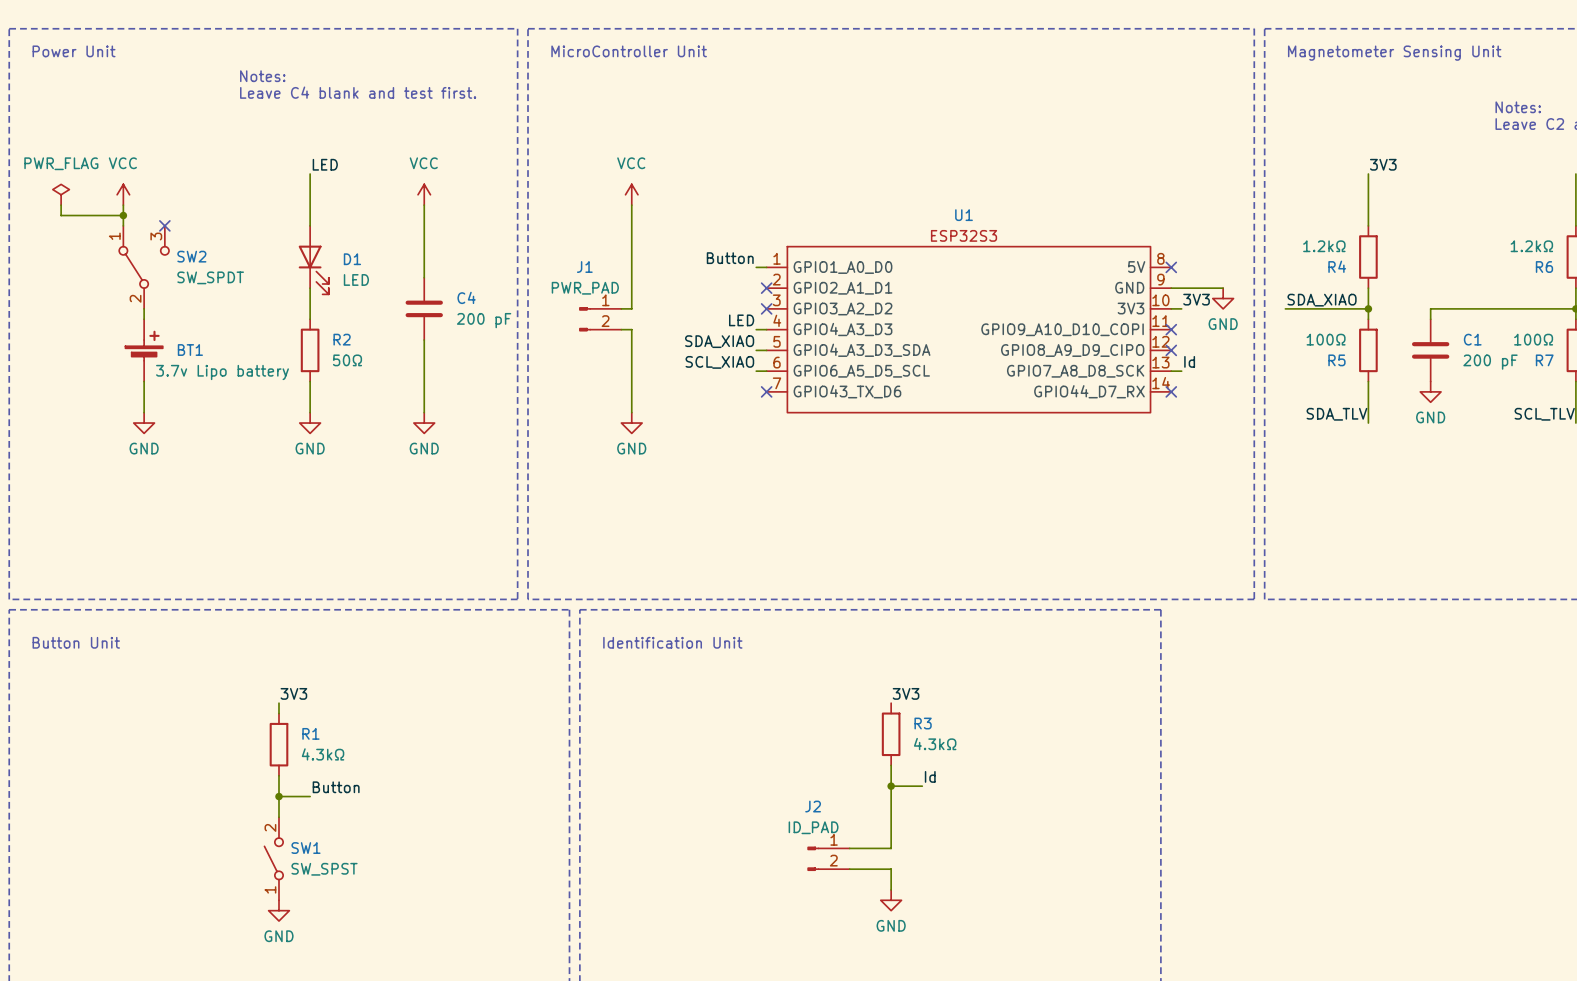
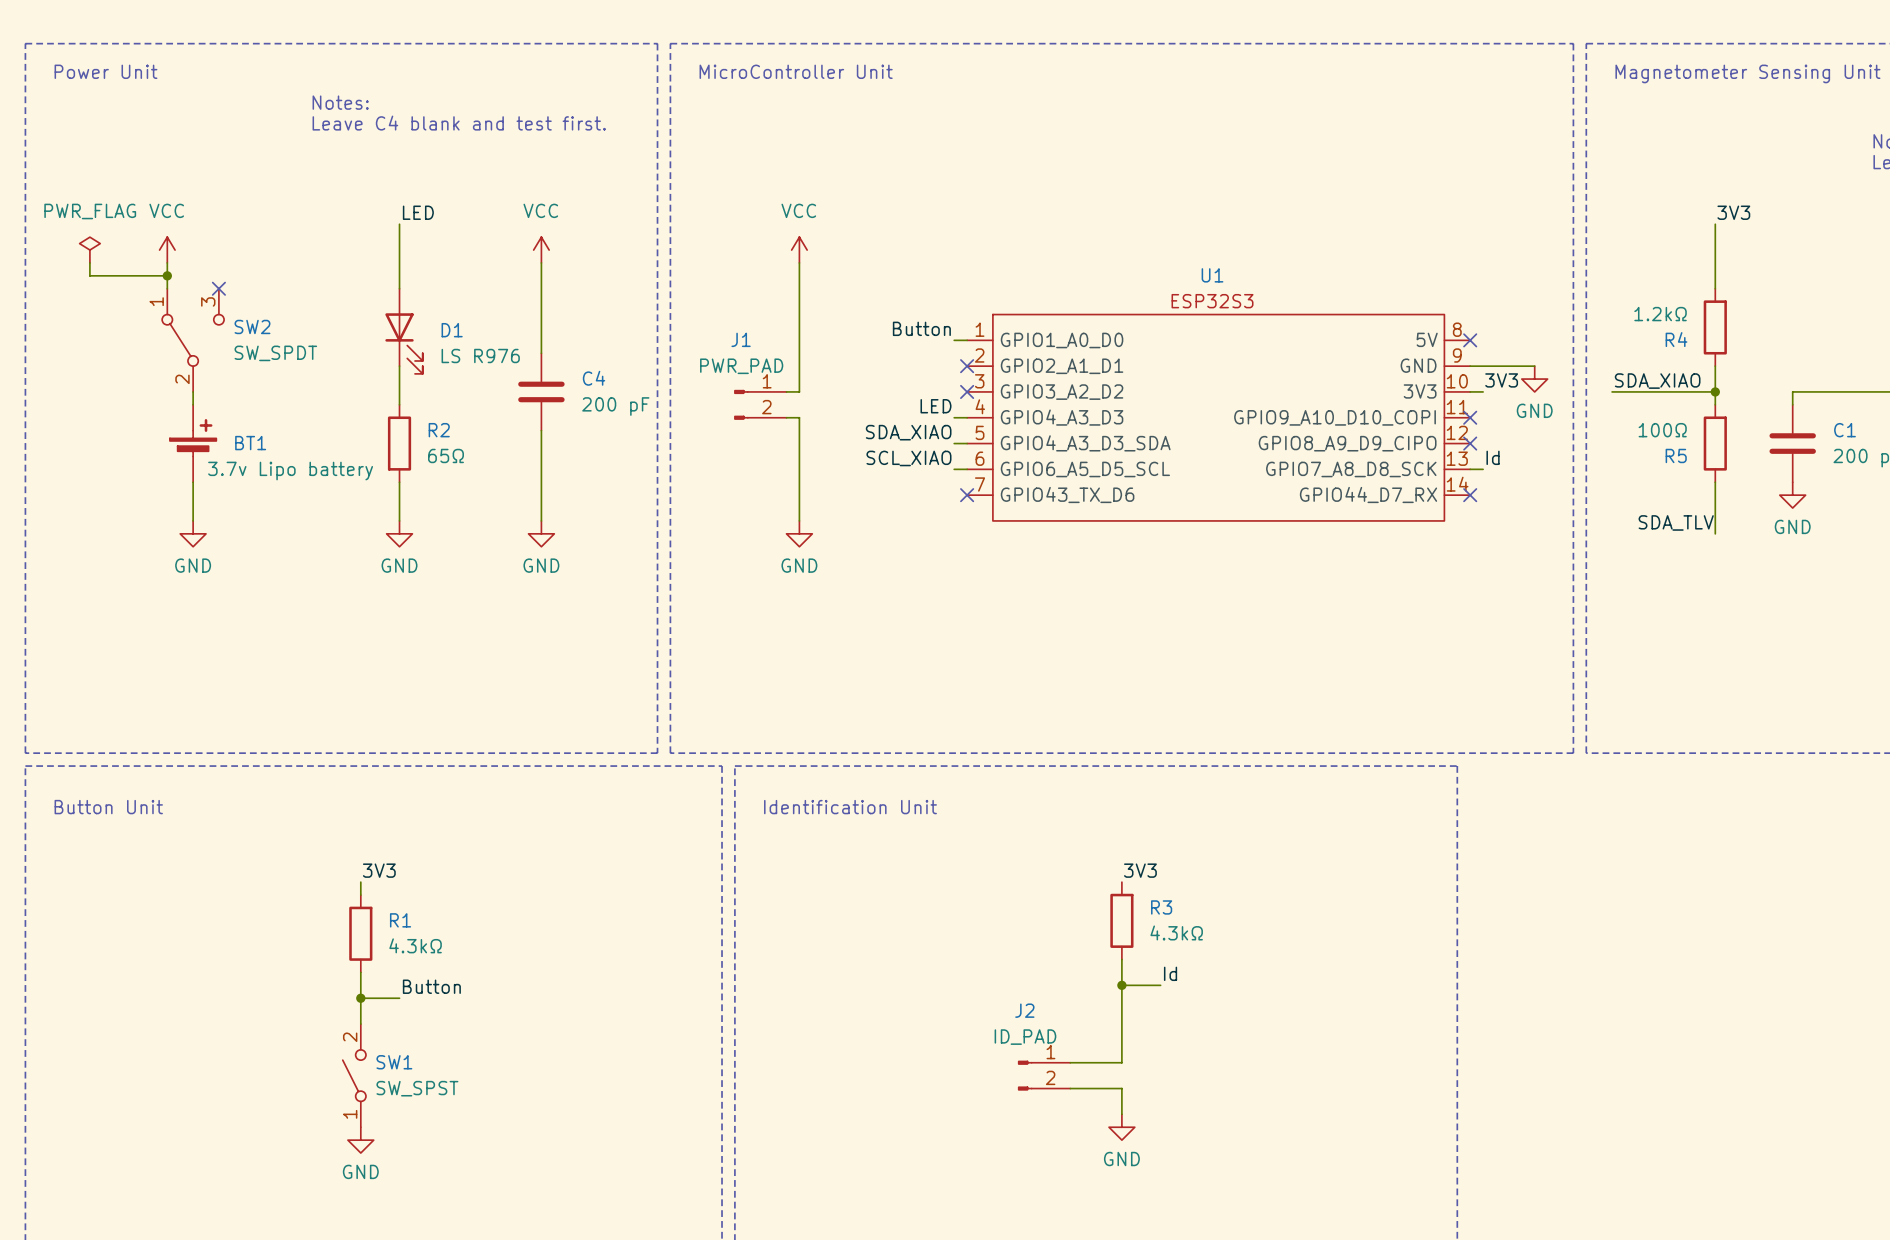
D1 value: LED (356, 279) -> LS R976 (480, 355)
R2 value: 50Ω (347, 360) -> 65Ω (445, 455)

